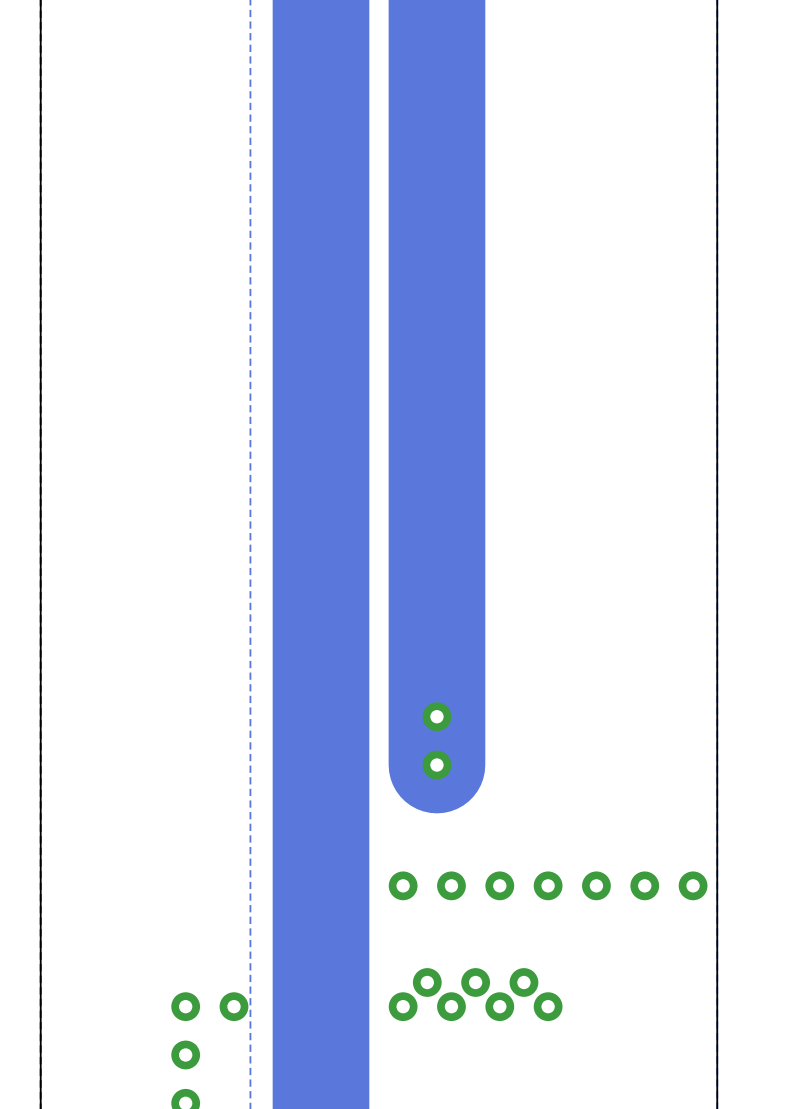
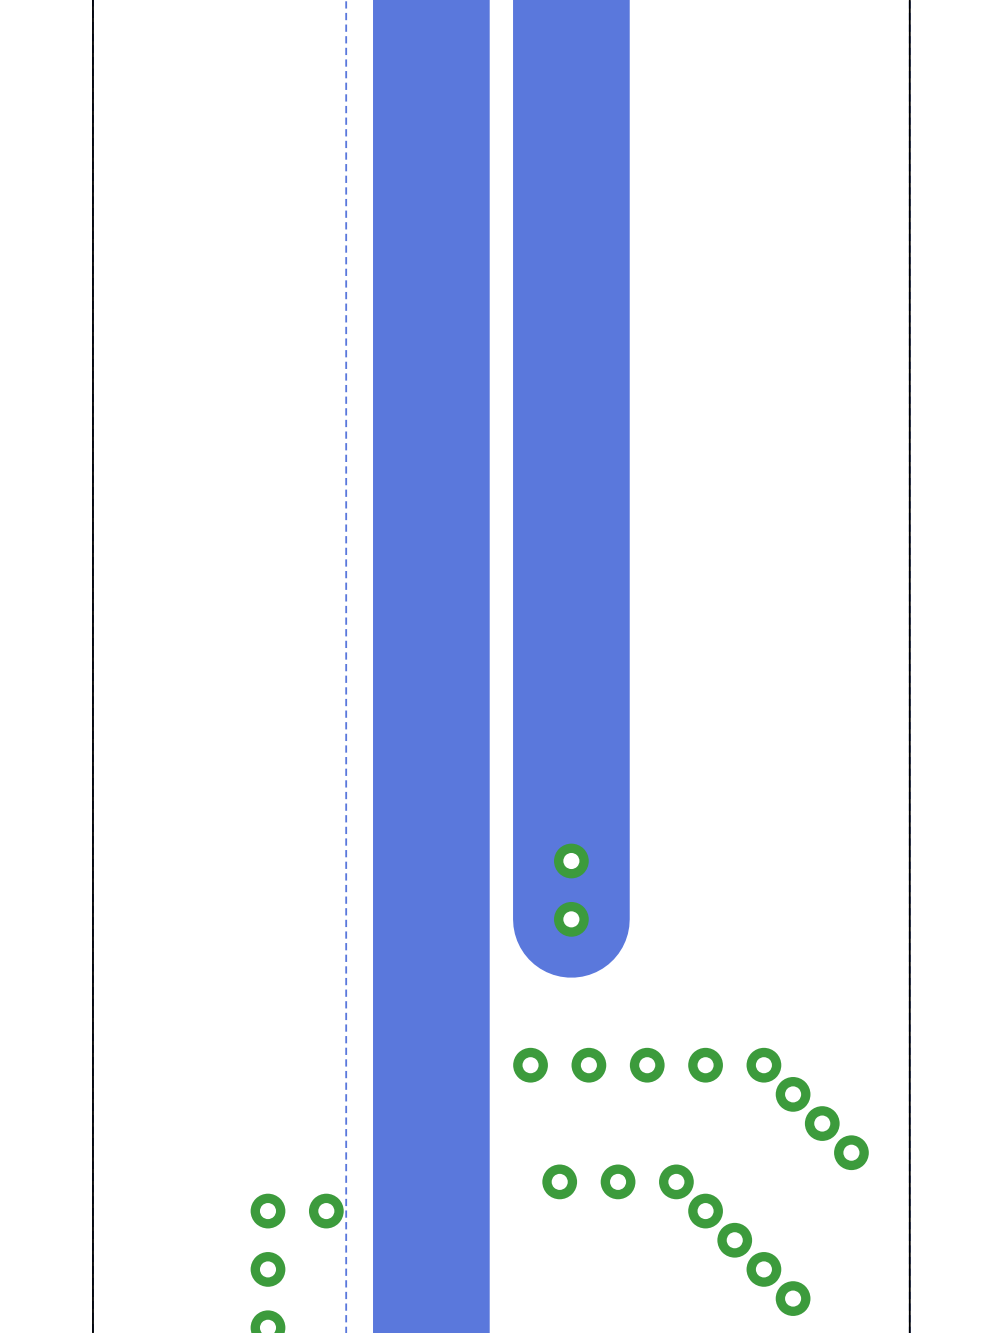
via position: (644, 885) -> (793, 1094)
via: (693, 885) -> none
via: none -> (822, 1123)
via: none -> (851, 1152)
via: (403, 1006) -> none
via: (451, 1006) -> none
via: (499, 1006) -> none
via: none -> (734, 1240)
via: none -> (763, 1269)
via: none -> (793, 1298)

